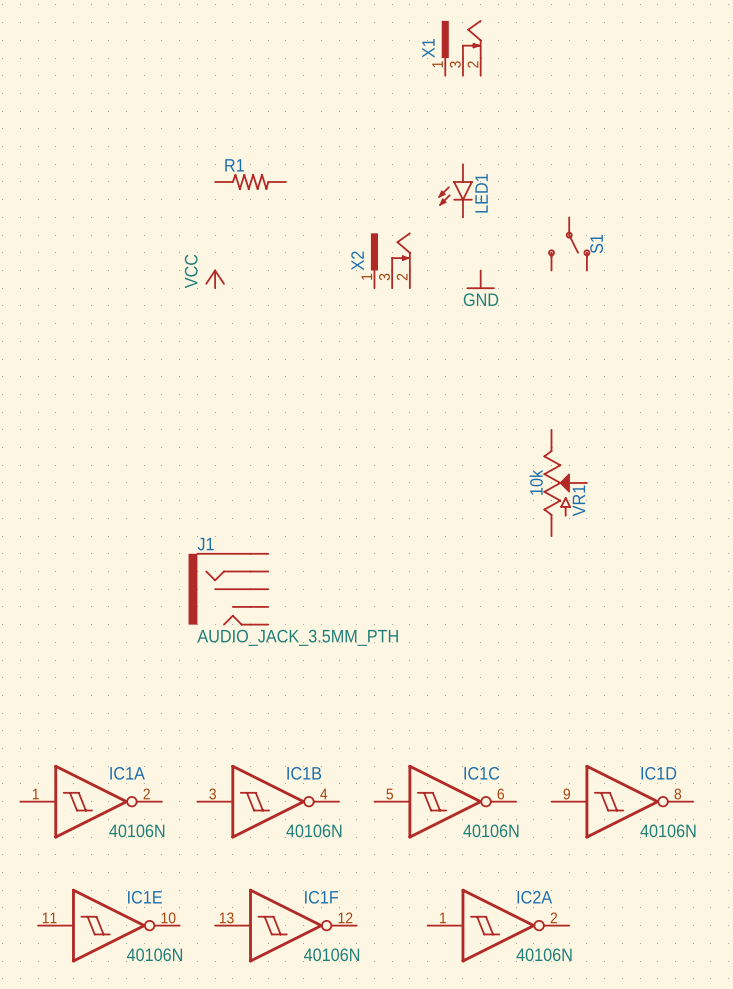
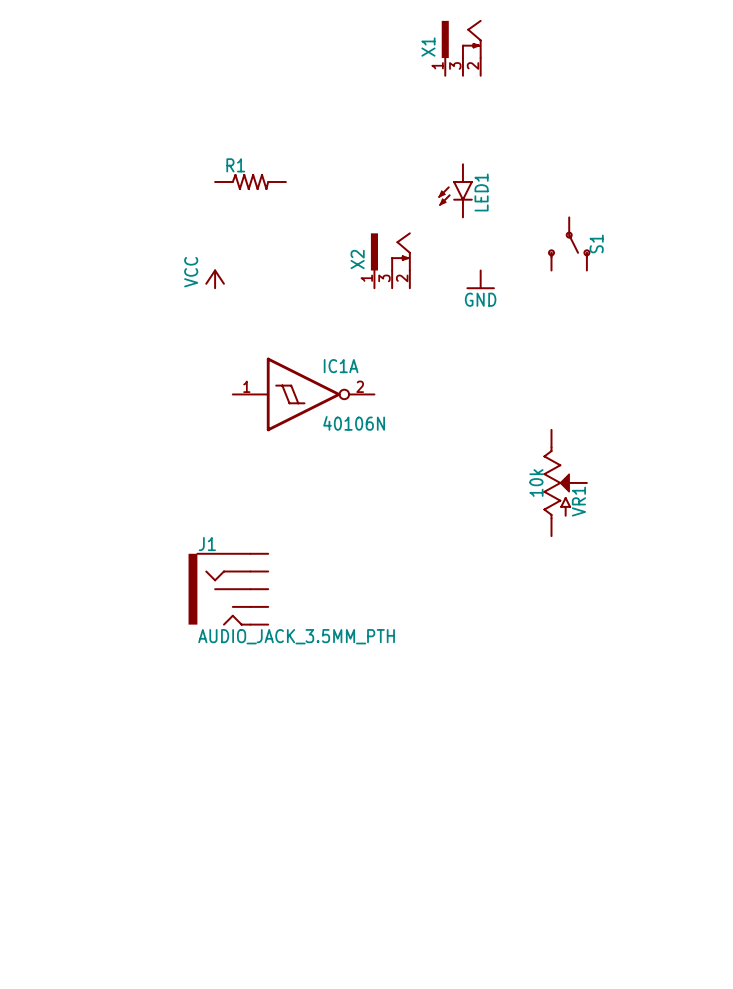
IC1A position: (91, 801) -> (303, 394)
IC1B: 40106N (268, 801) -> none
IC1C: 40106N (445, 801) -> none
IC1D: 40106N (622, 801) -> none
IC1E: 40106N (108, 925) -> none
IC1F: 40106N (285, 925) -> none
IC2A: 40106N (498, 925) -> none

